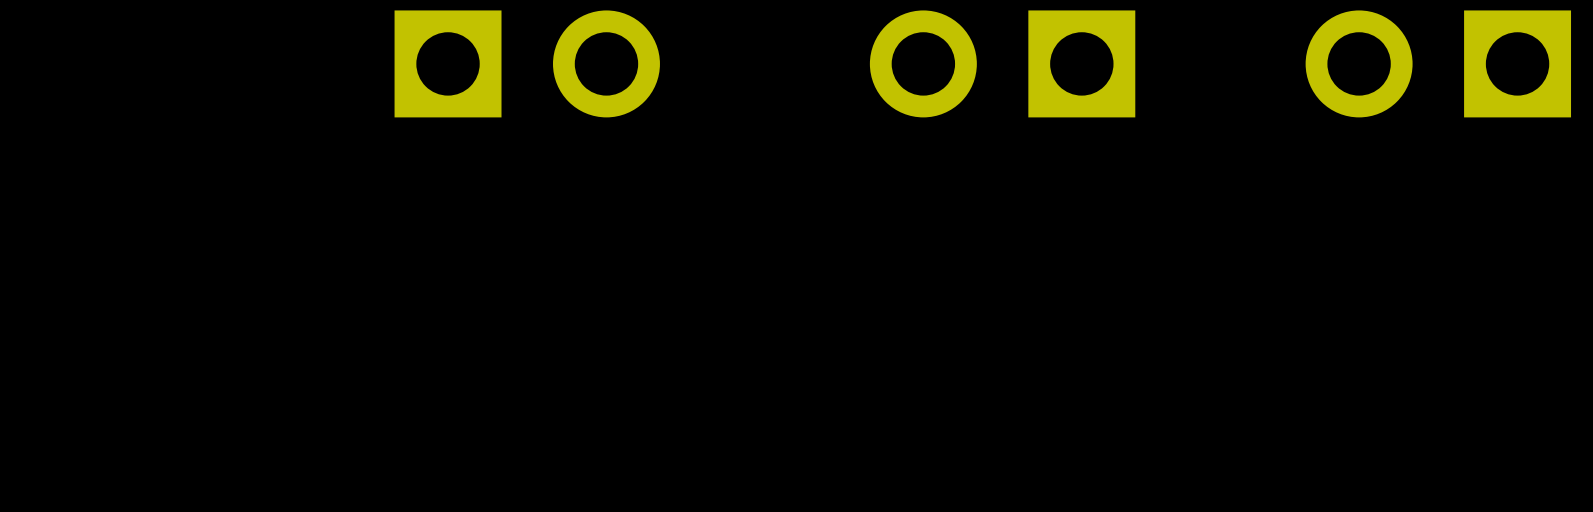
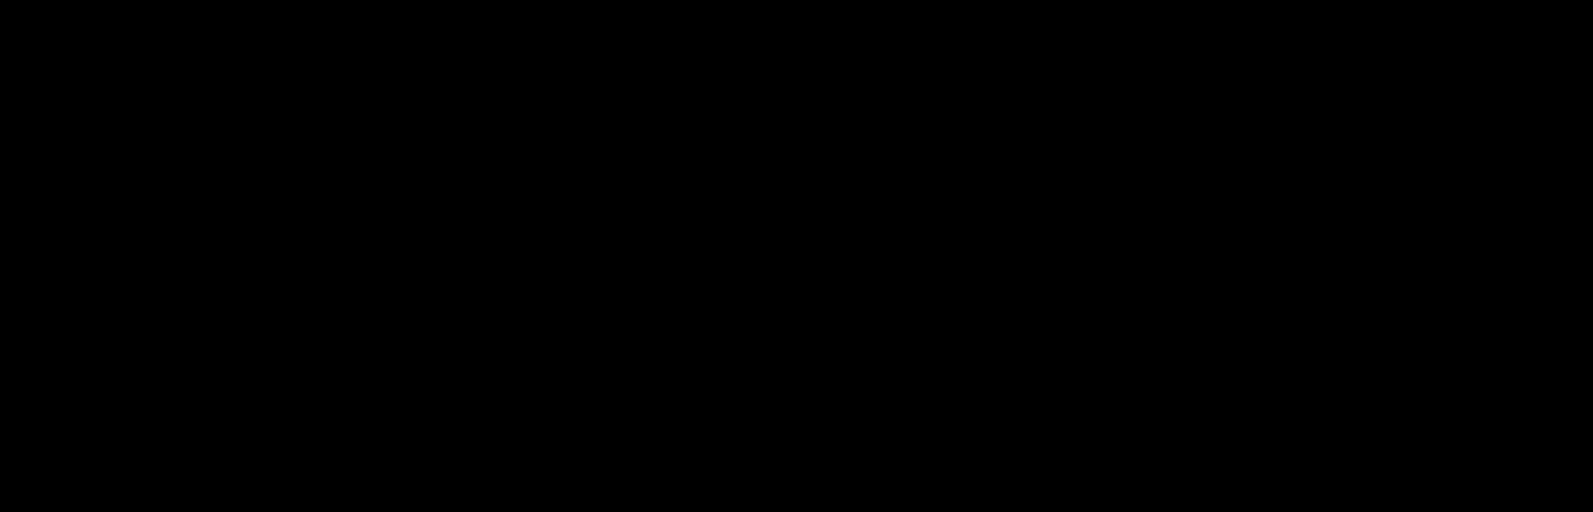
part: (527, 63) -> none
part: (1002, 63) -> none
part: (1438, 63) -> none

